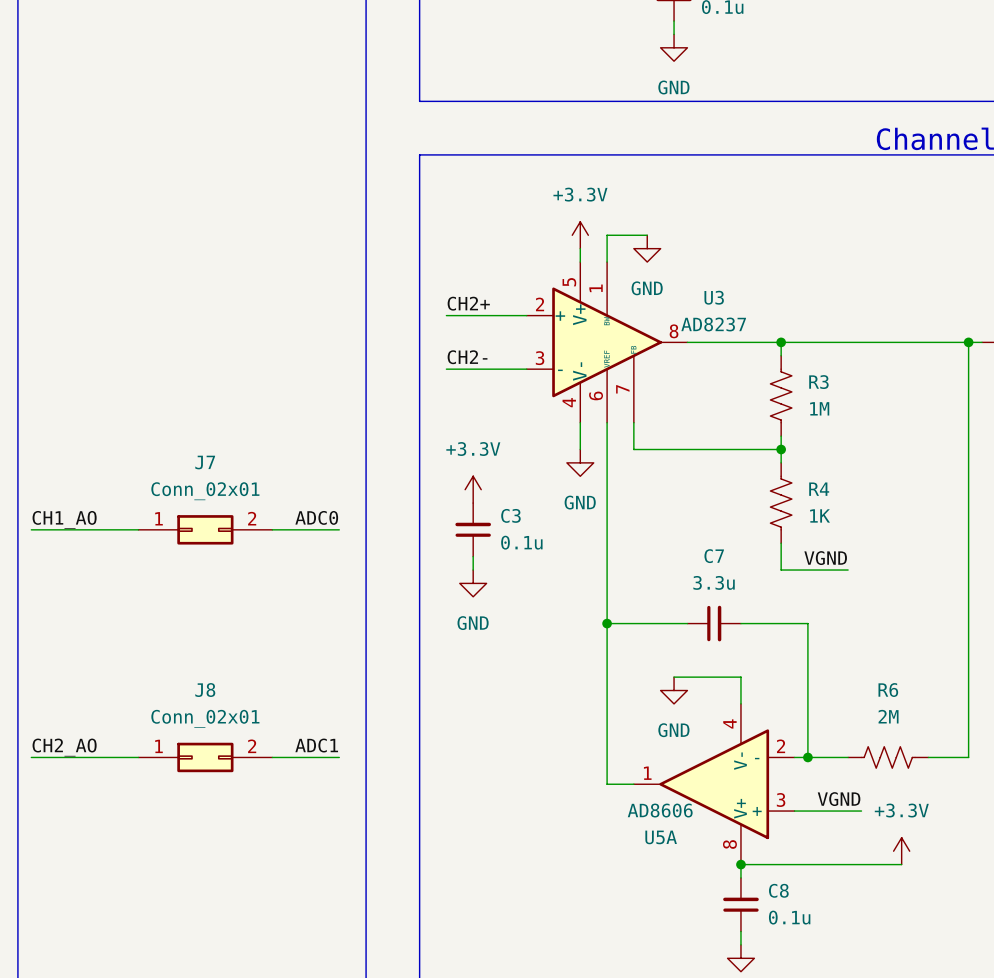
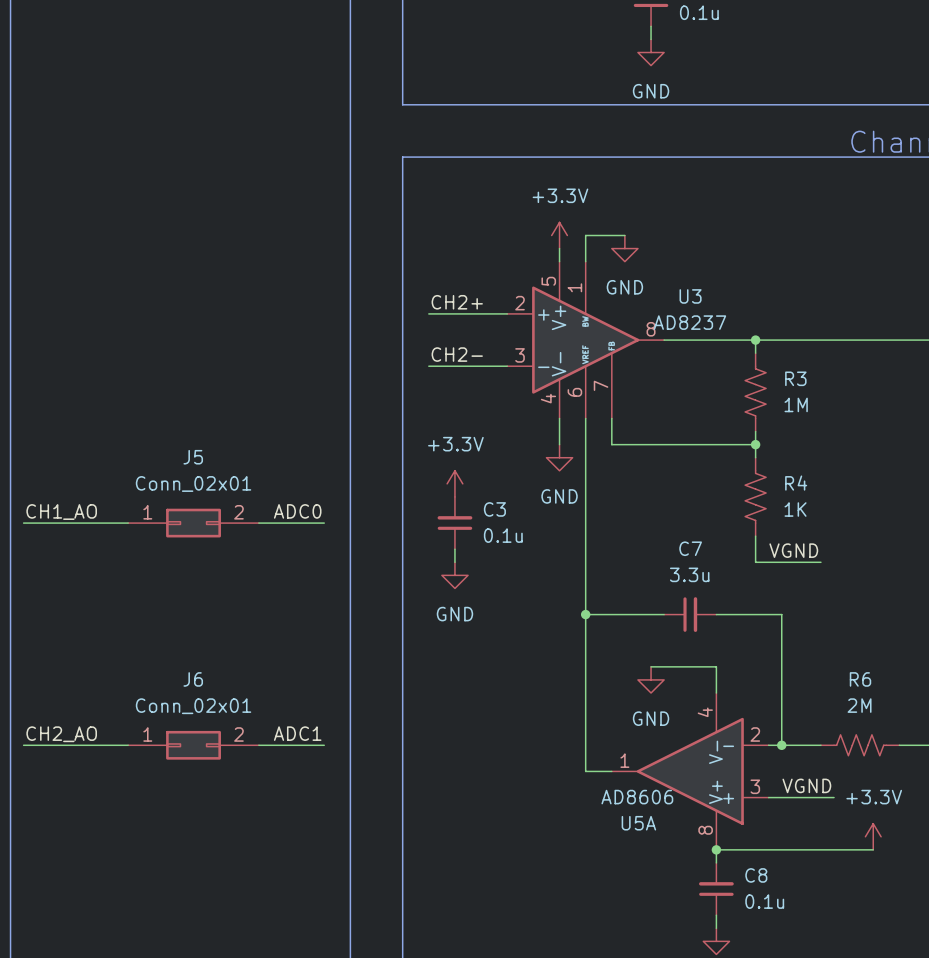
J7 name: J7 (205, 462) -> J5 (193, 457)
J8 name: J8 (205, 690) -> J6 (193, 679)

